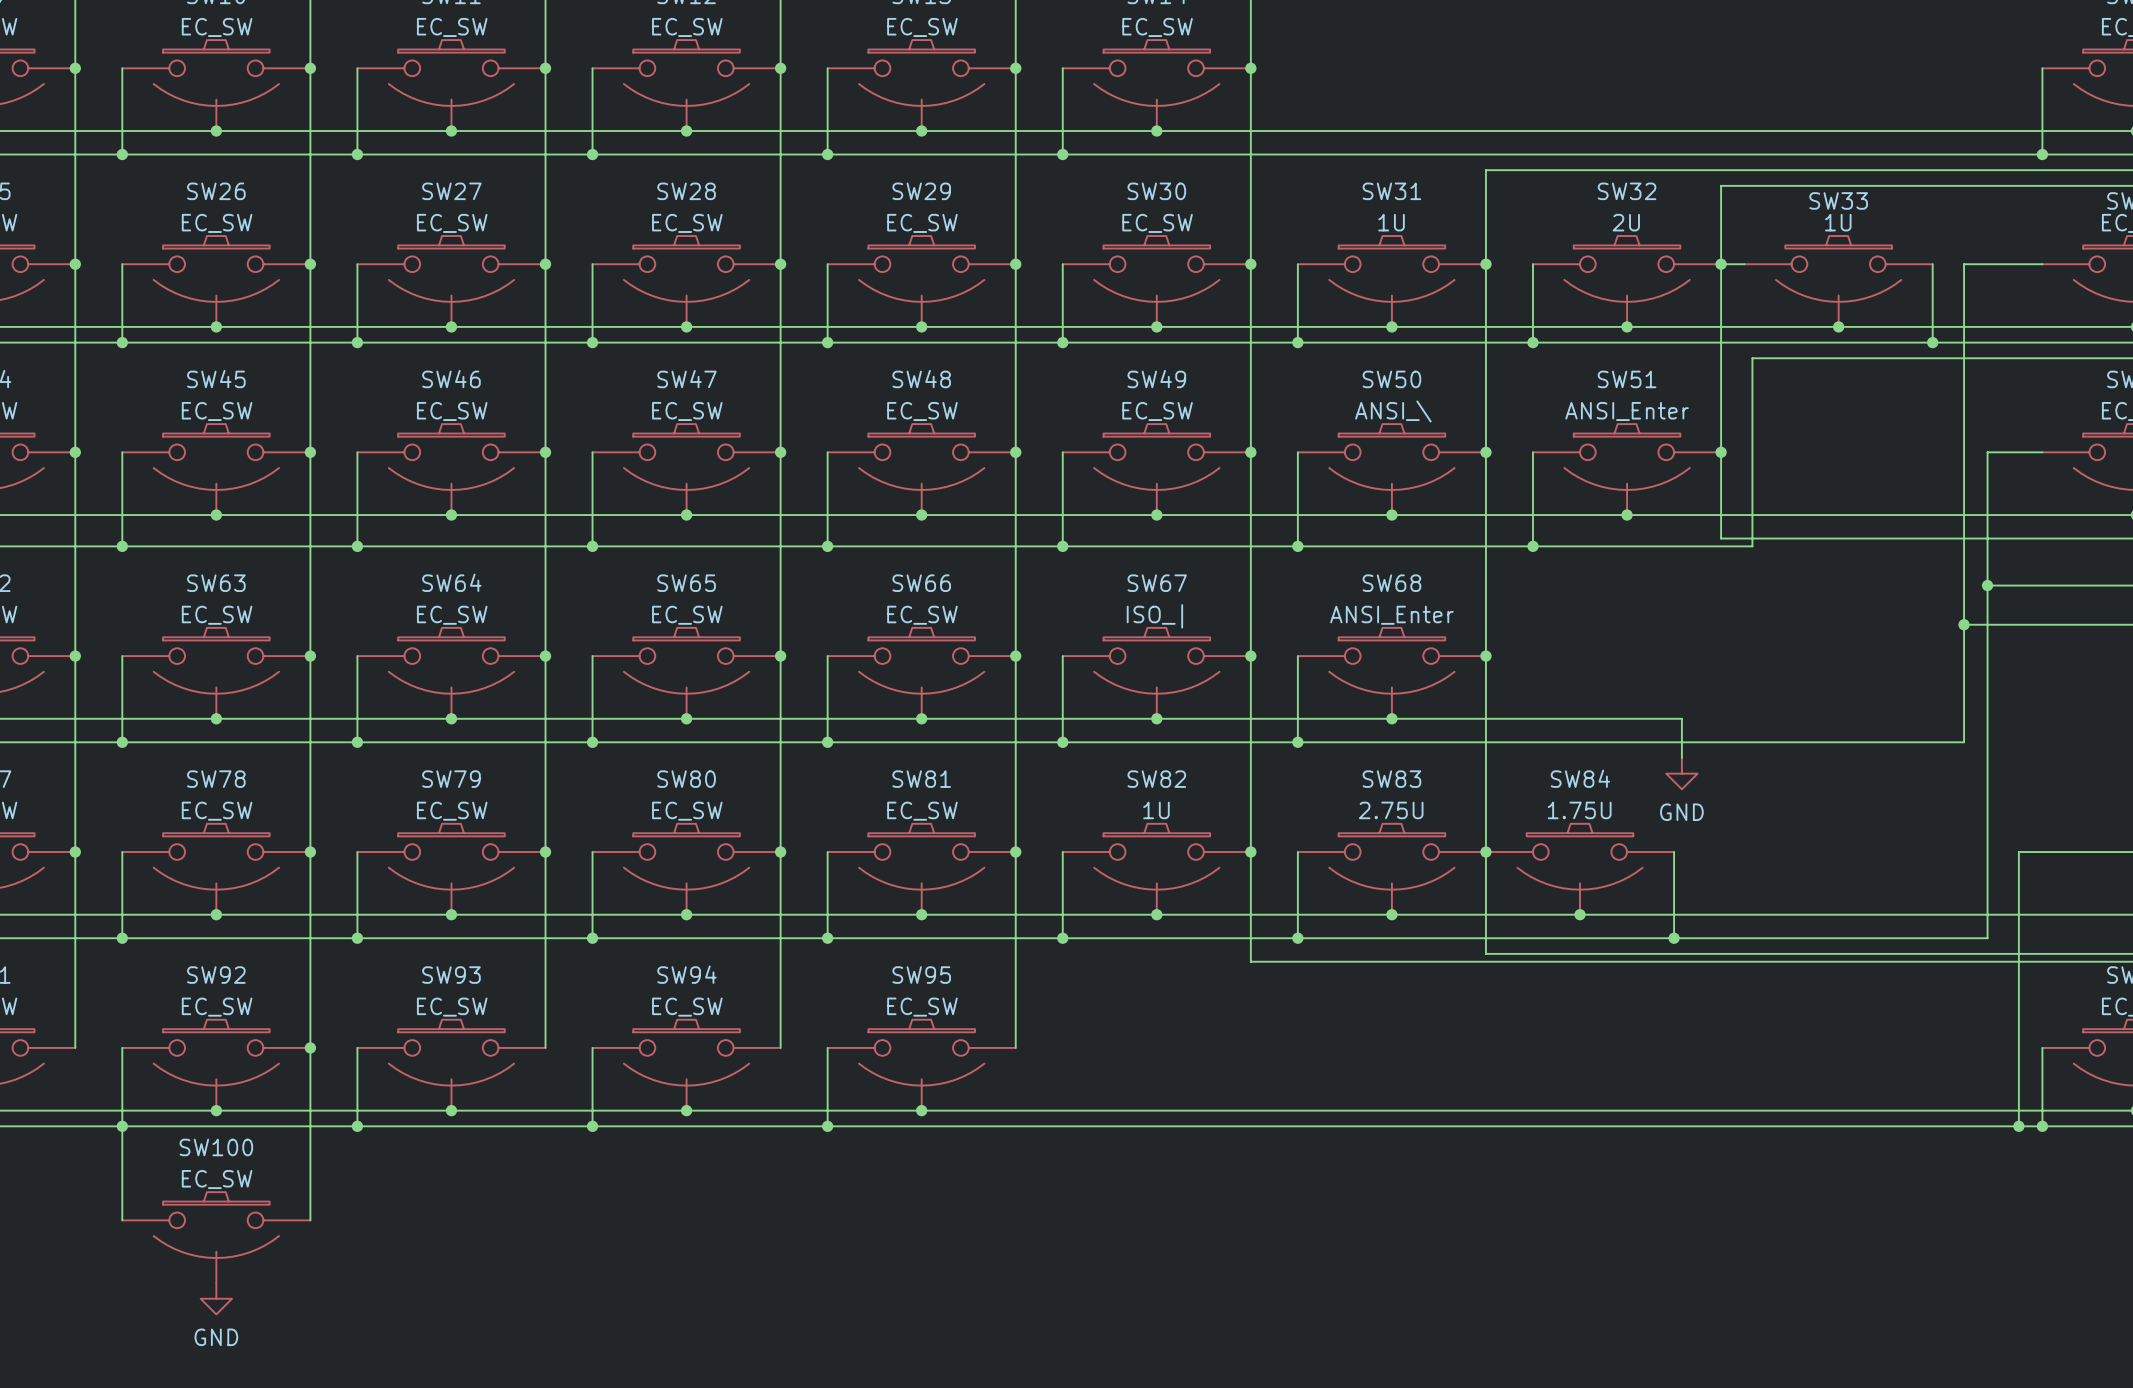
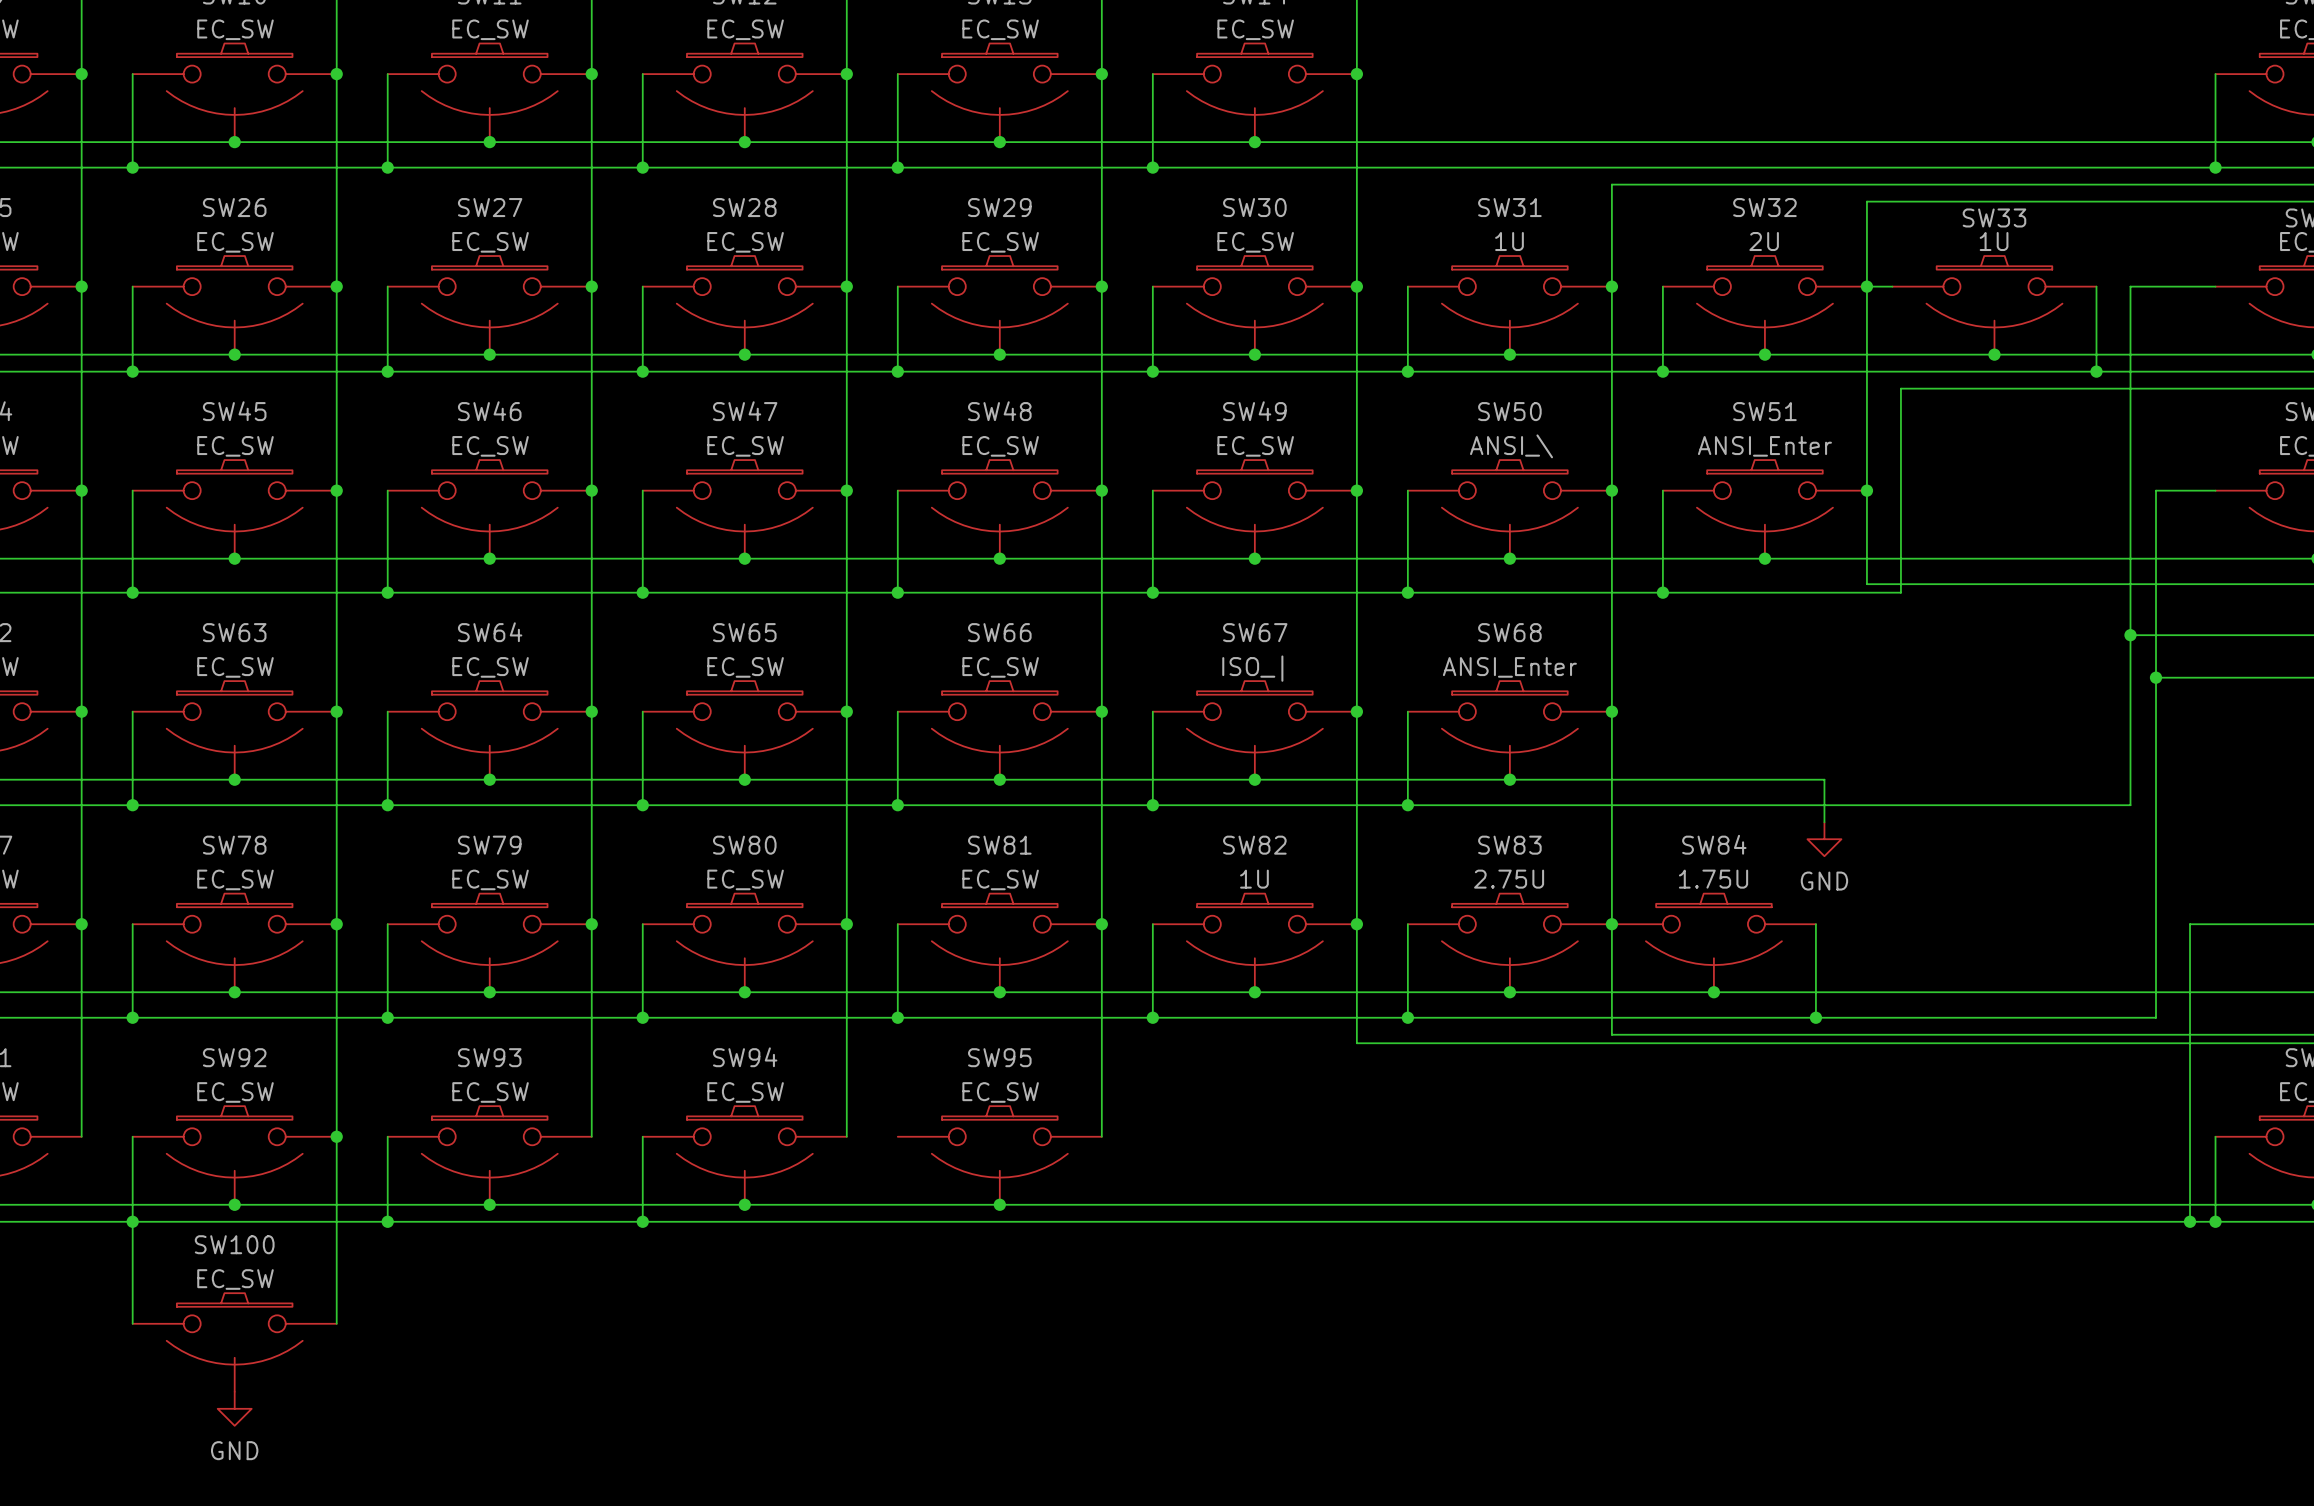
junction: none -> (2130, 635)
junction: (1987, 585) -> none
wire: (1964, 624) (1987, 624) -> (2130, 635) (2156, 635)
junction: (1964, 624) -> none
junction: none -> (2156, 677)
wire: (827, 1047) (827, 1126) -> none
junction: (827, 1126) -> none

